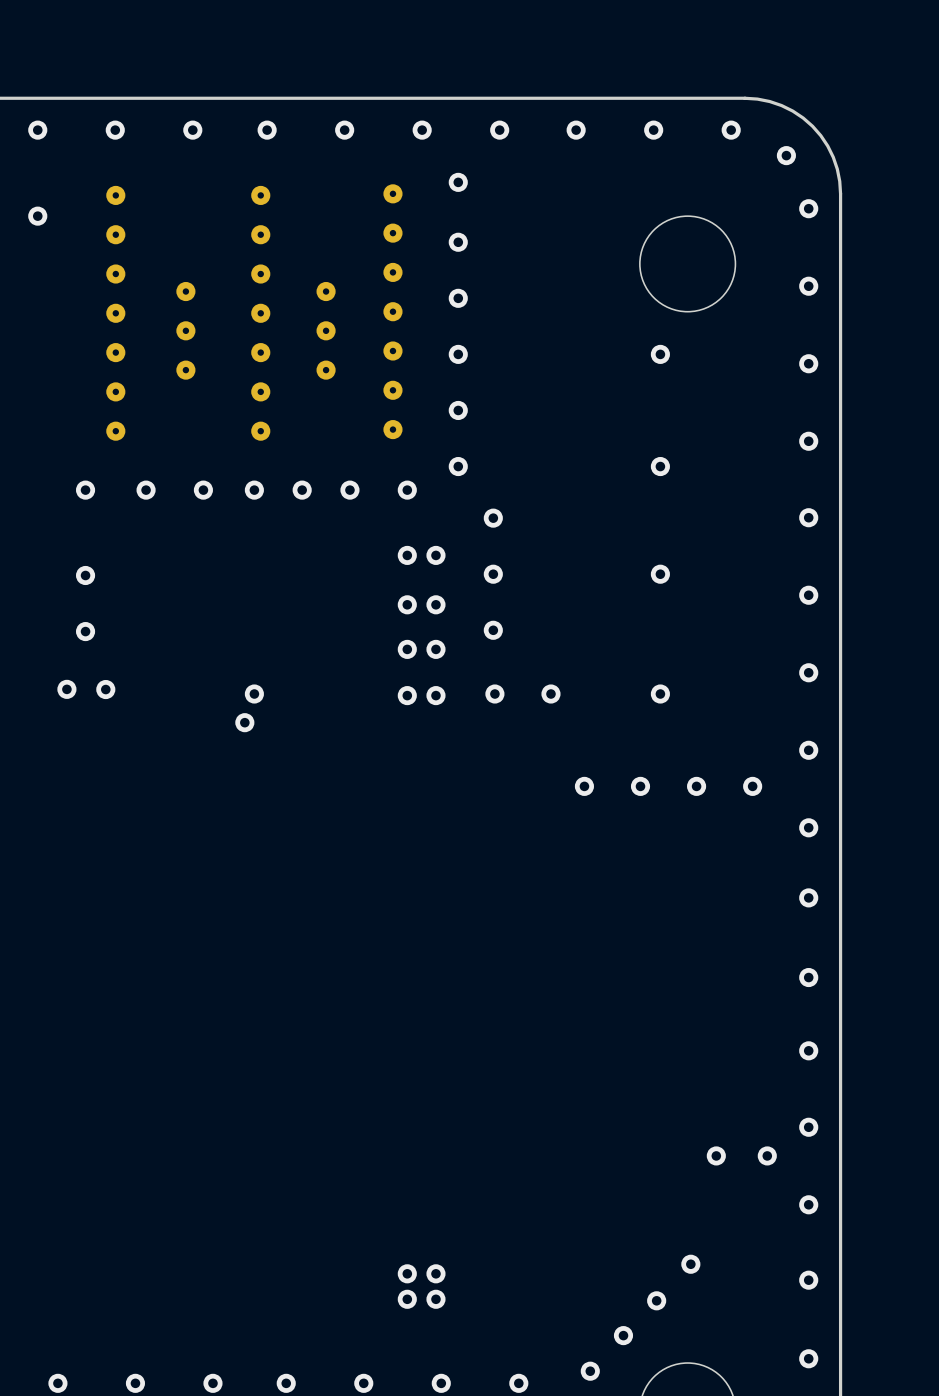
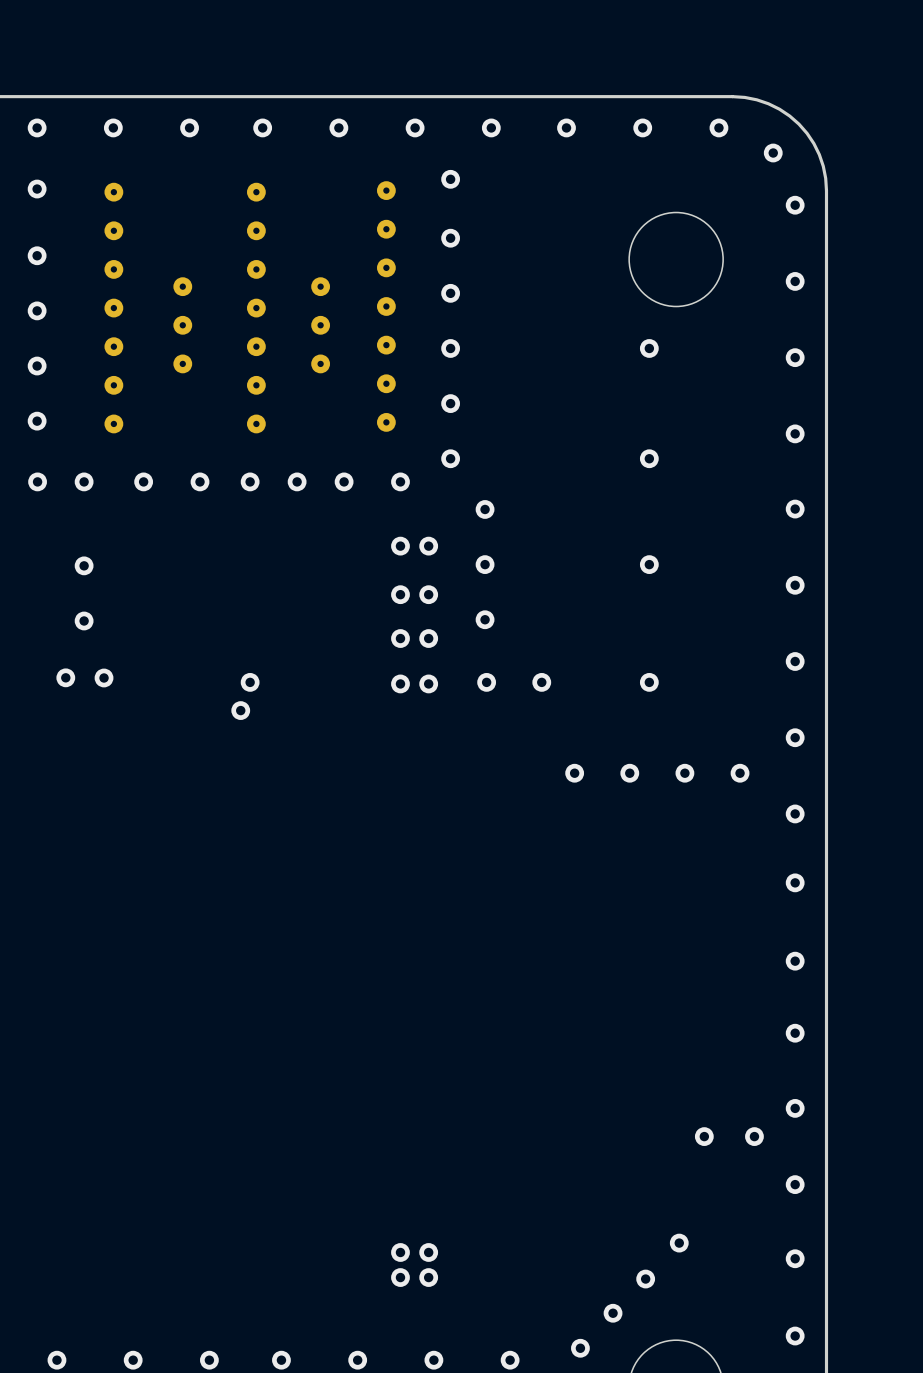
via: none -> (37, 189)
via: (37, 216) -> none
via: none -> (37, 255)
via: none -> (37, 310)
via: none -> (37, 366)
via: none -> (37, 421)
via: none -> (37, 481)

